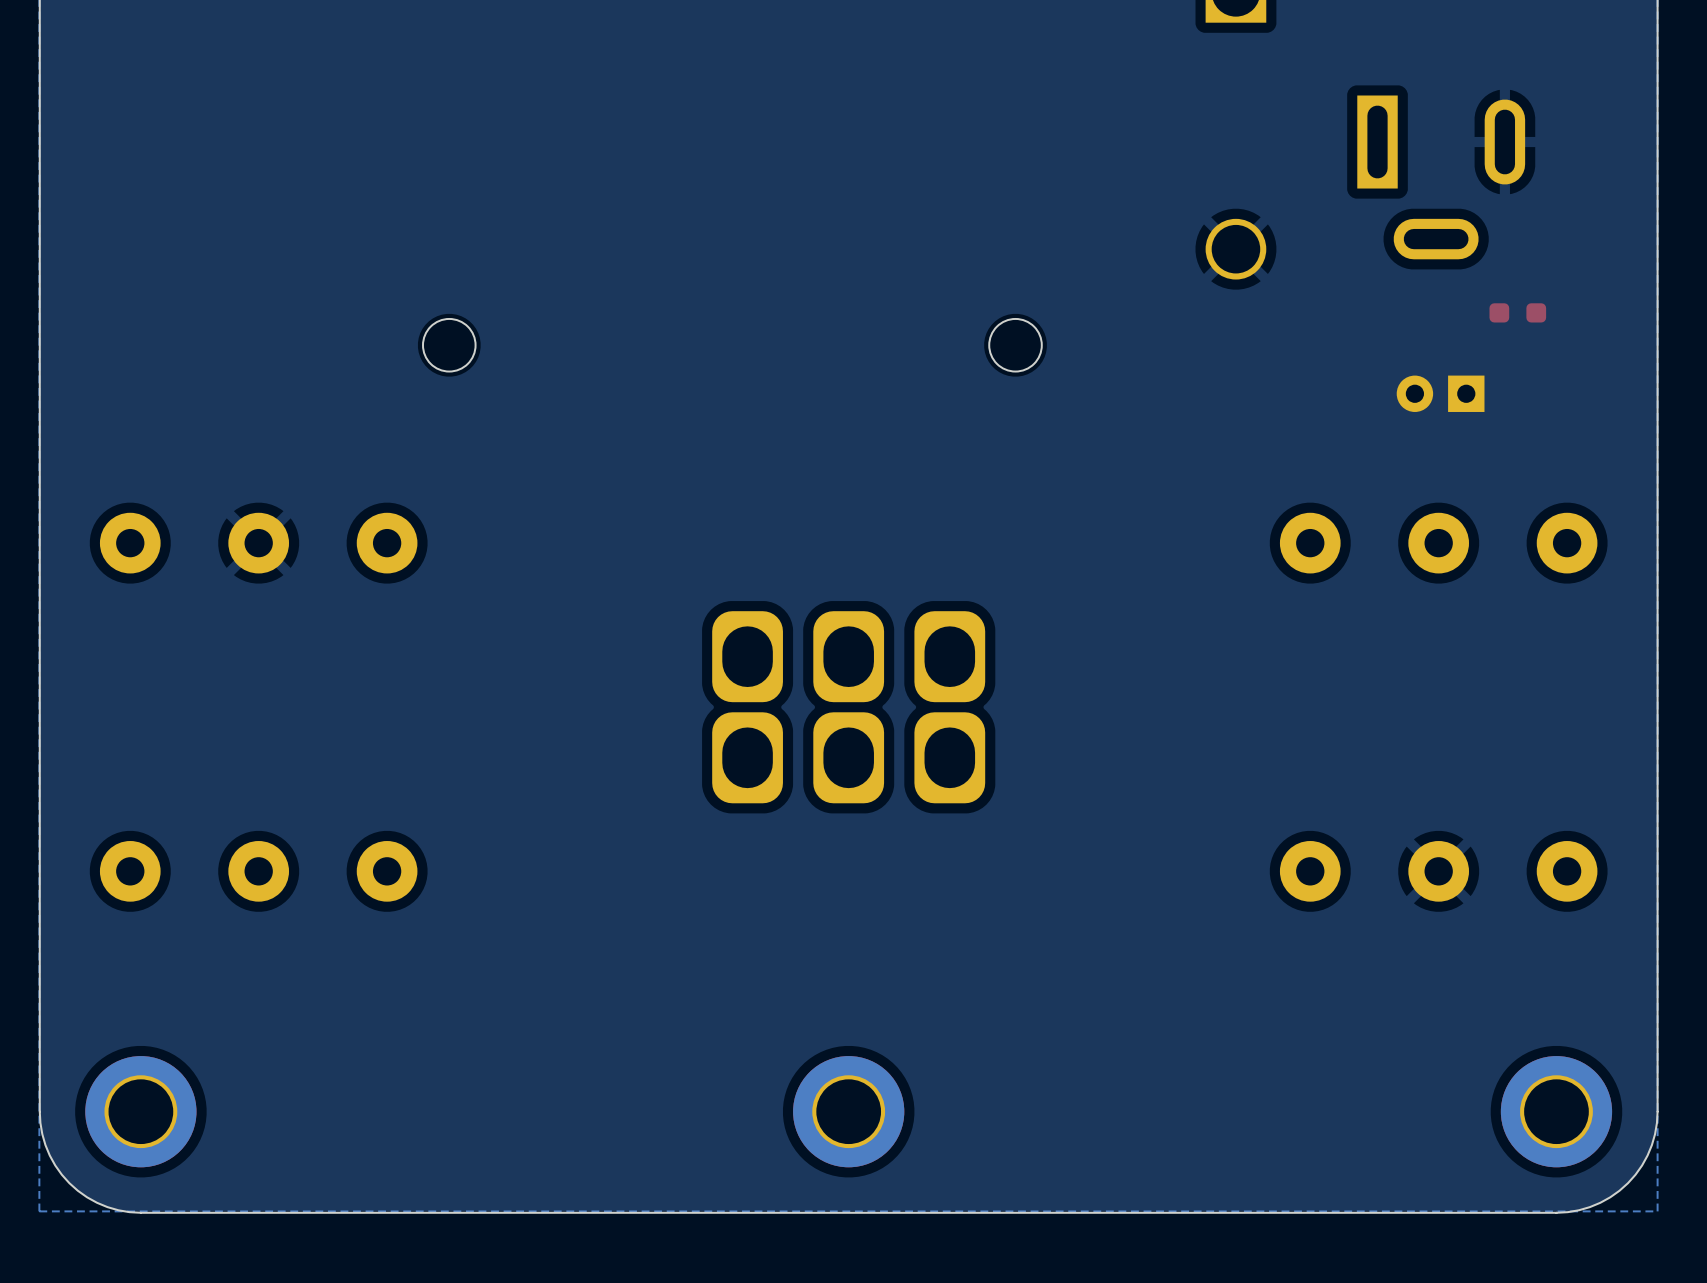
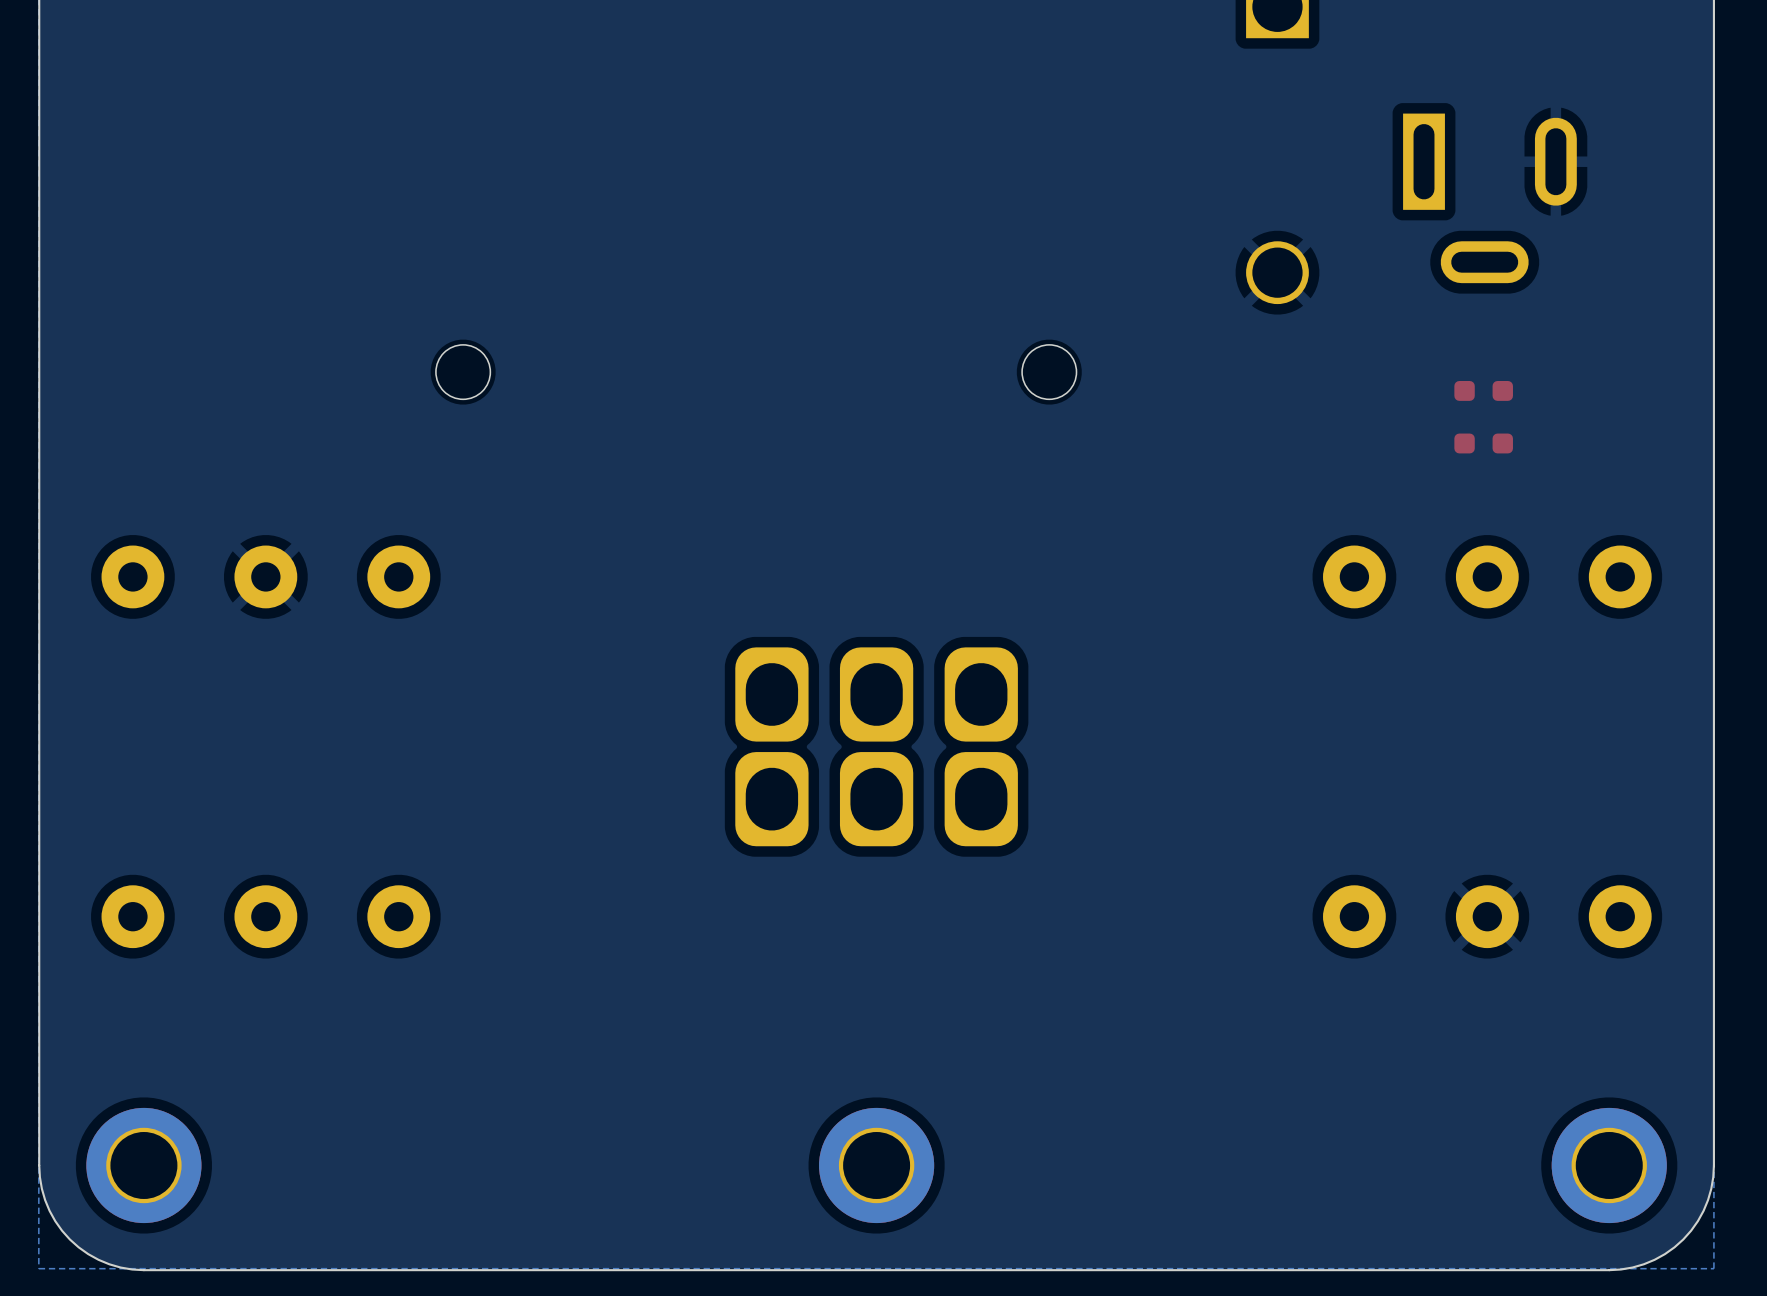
part: (1517, 312) -> none
part: none -> (1483, 390)
part: (1440, 393) -> none
part: none -> (1483, 443)

